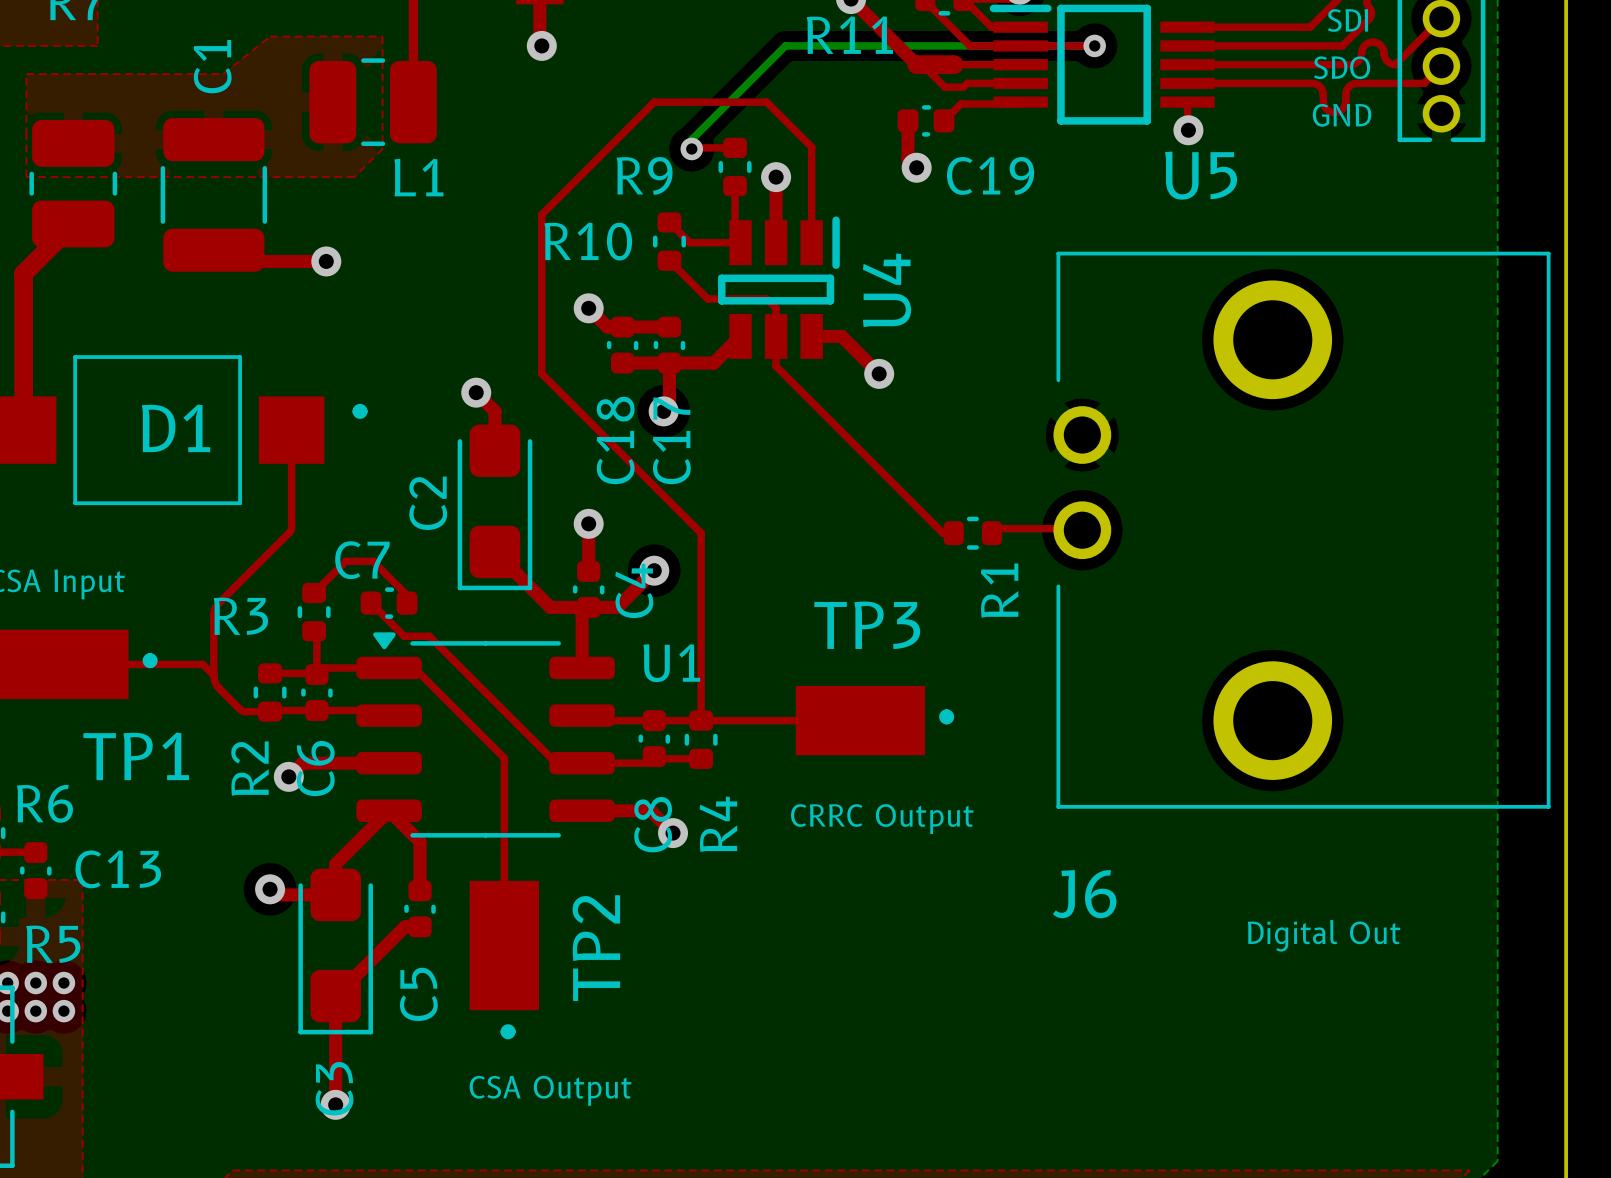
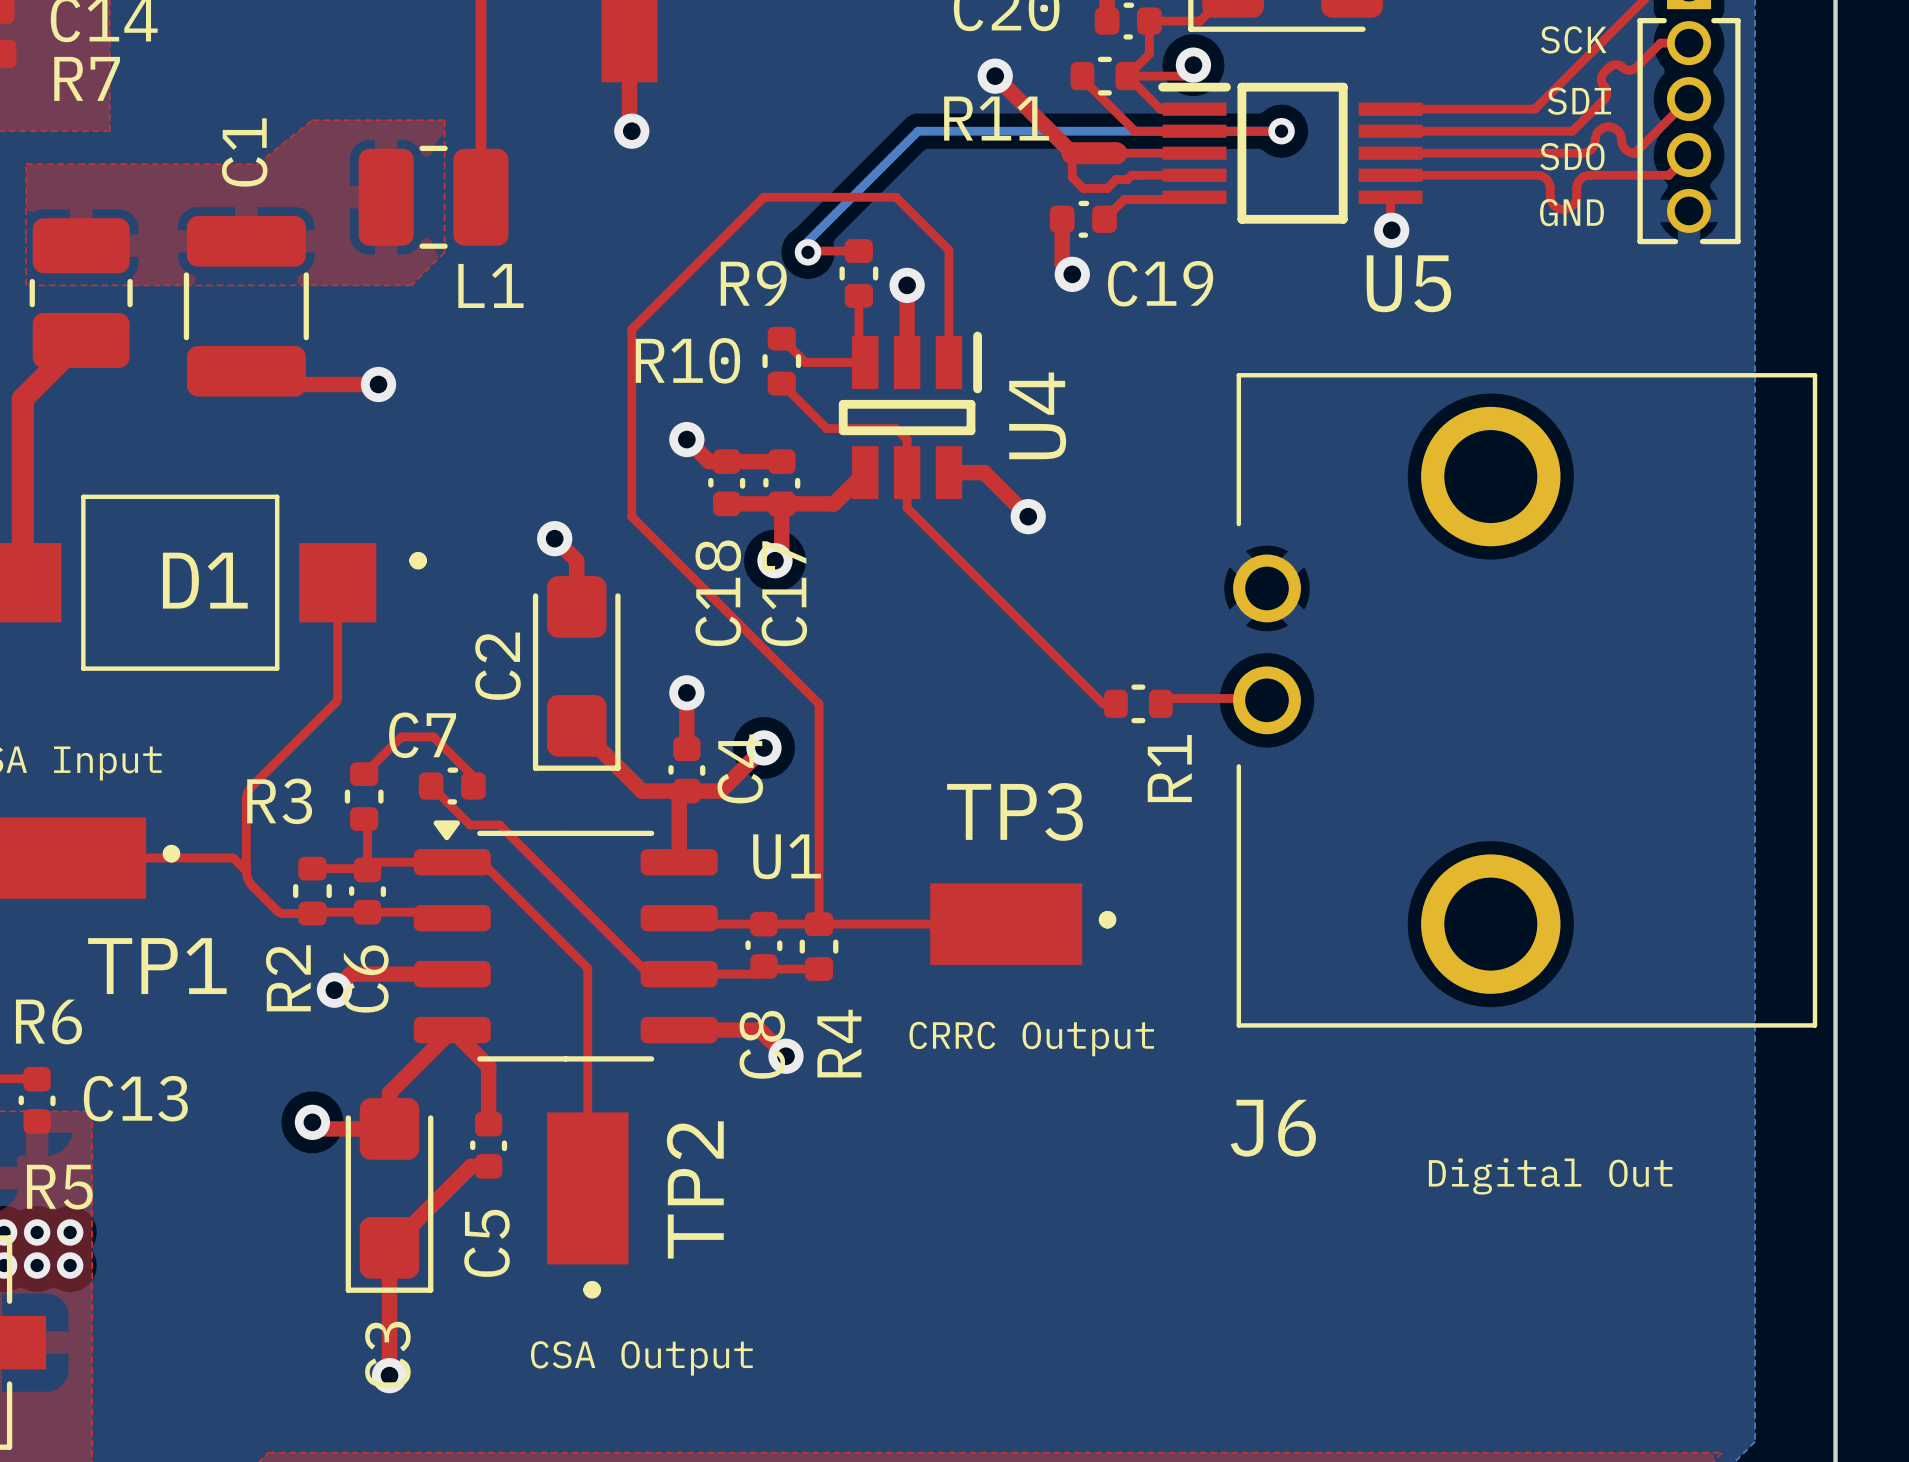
top track: (926, 64) (926, 68) (944, 87) (953, 87) -> (1072, 153) (1072, 177) (1083, 188) (1107, 188) (1116, 179)

